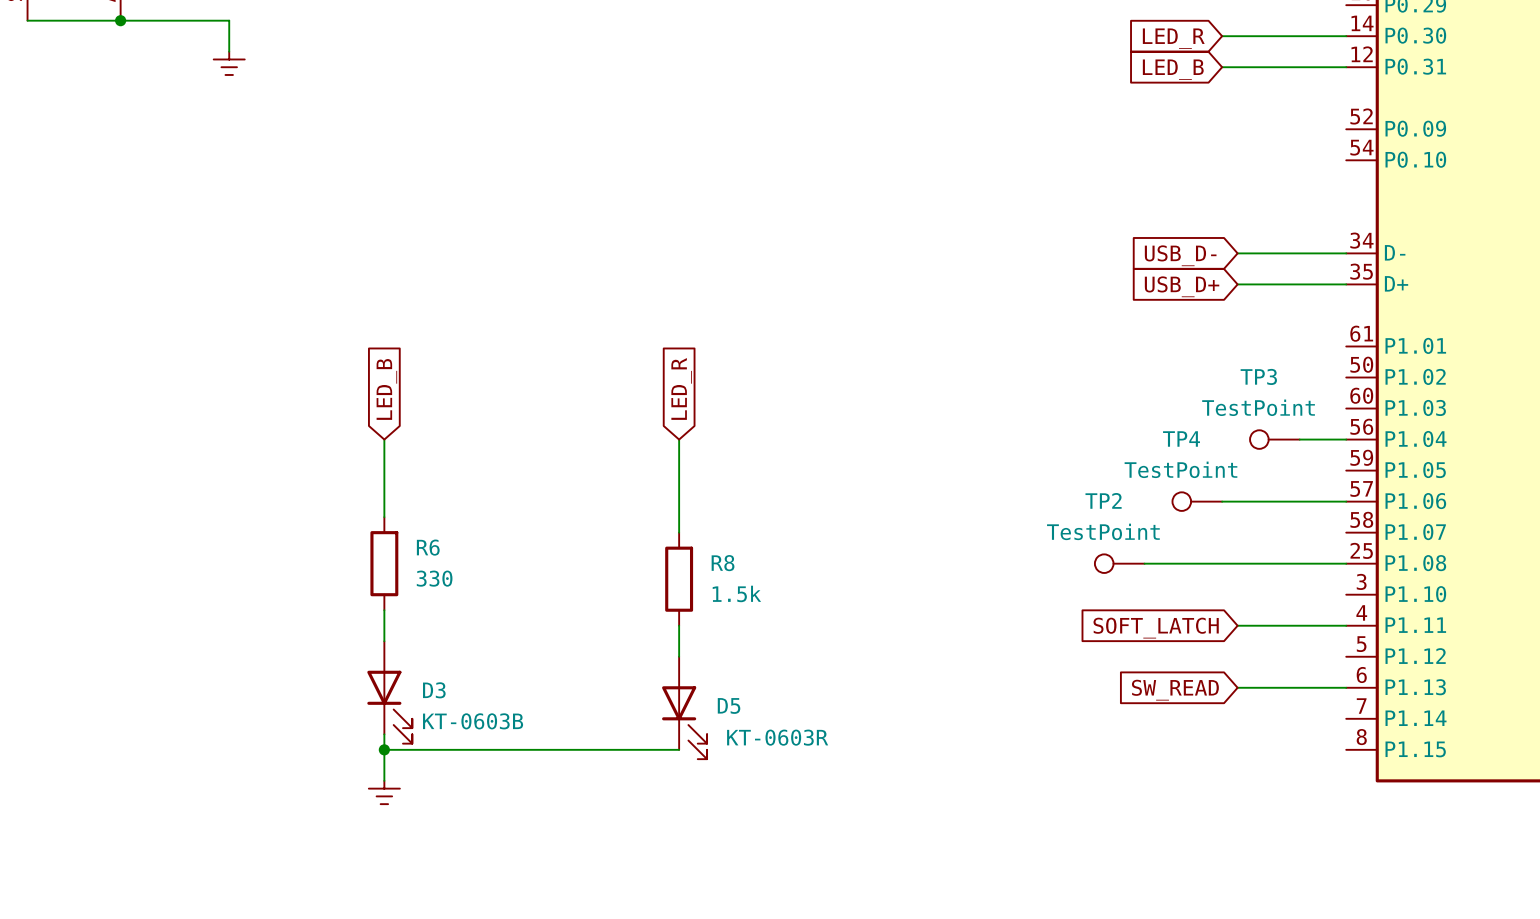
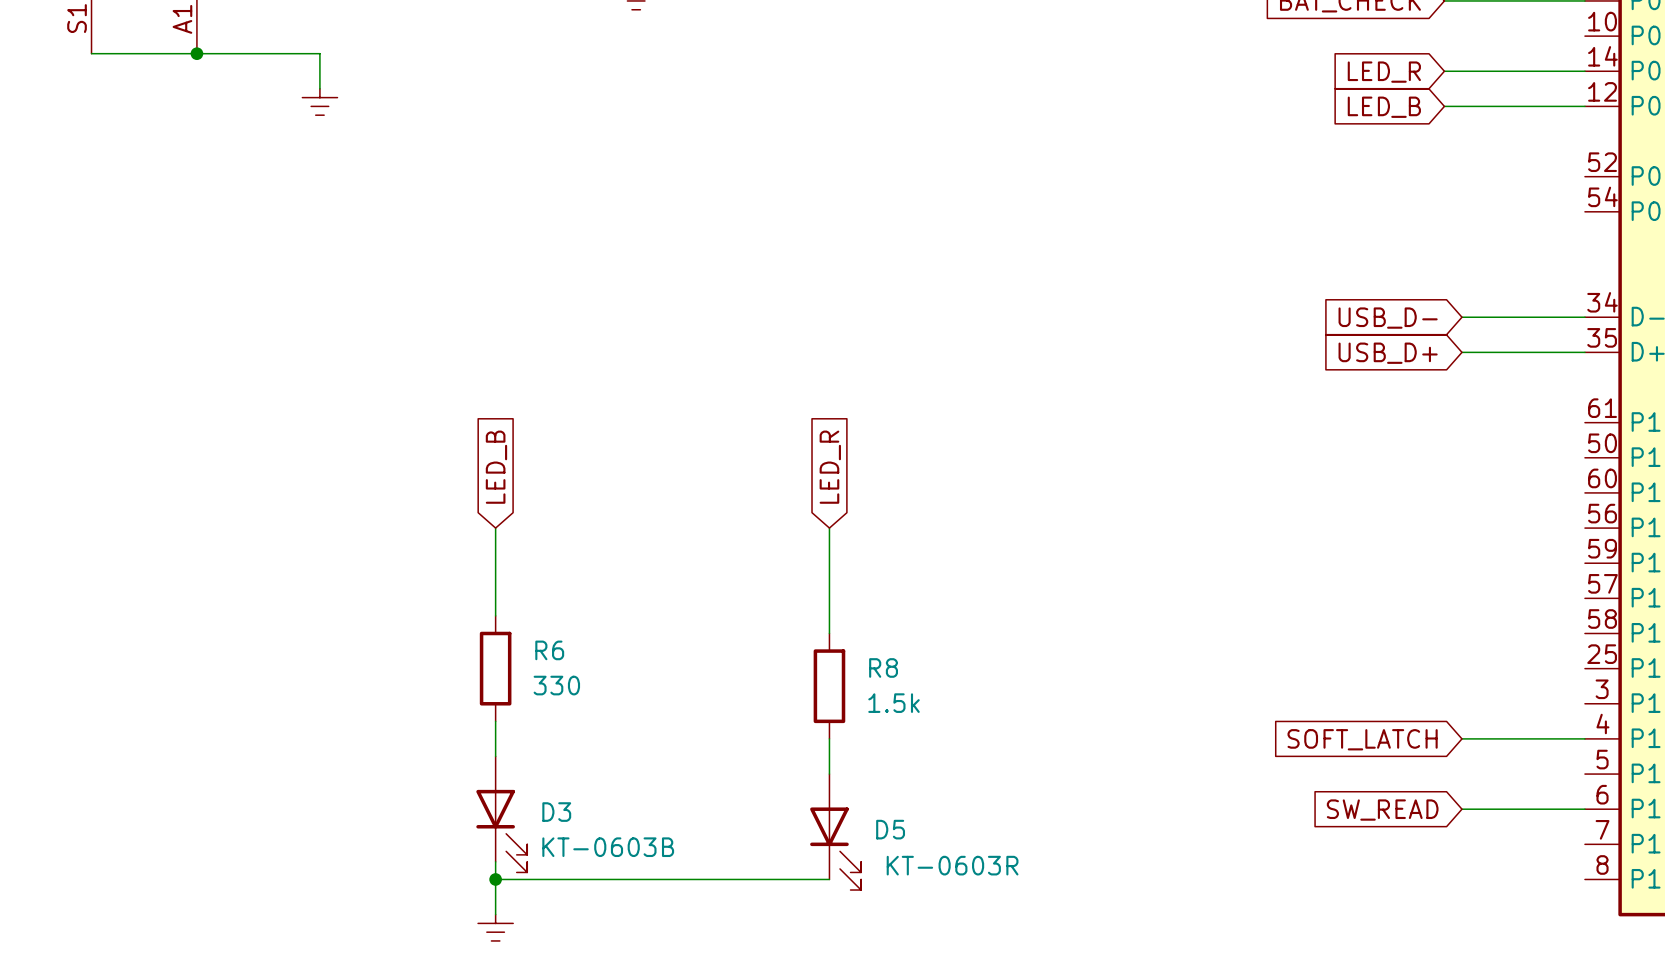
TP3: TestPoint (1274, 439) -> none
wire: (1299, 439) (1346, 439) -> none
TP4: TestPoint (1197, 501) -> none
wire: (1222, 501) (1346, 501) -> none
TP2: TestPoint (1119, 563) -> none
wire: (1144, 563) (1346, 563) -> none

